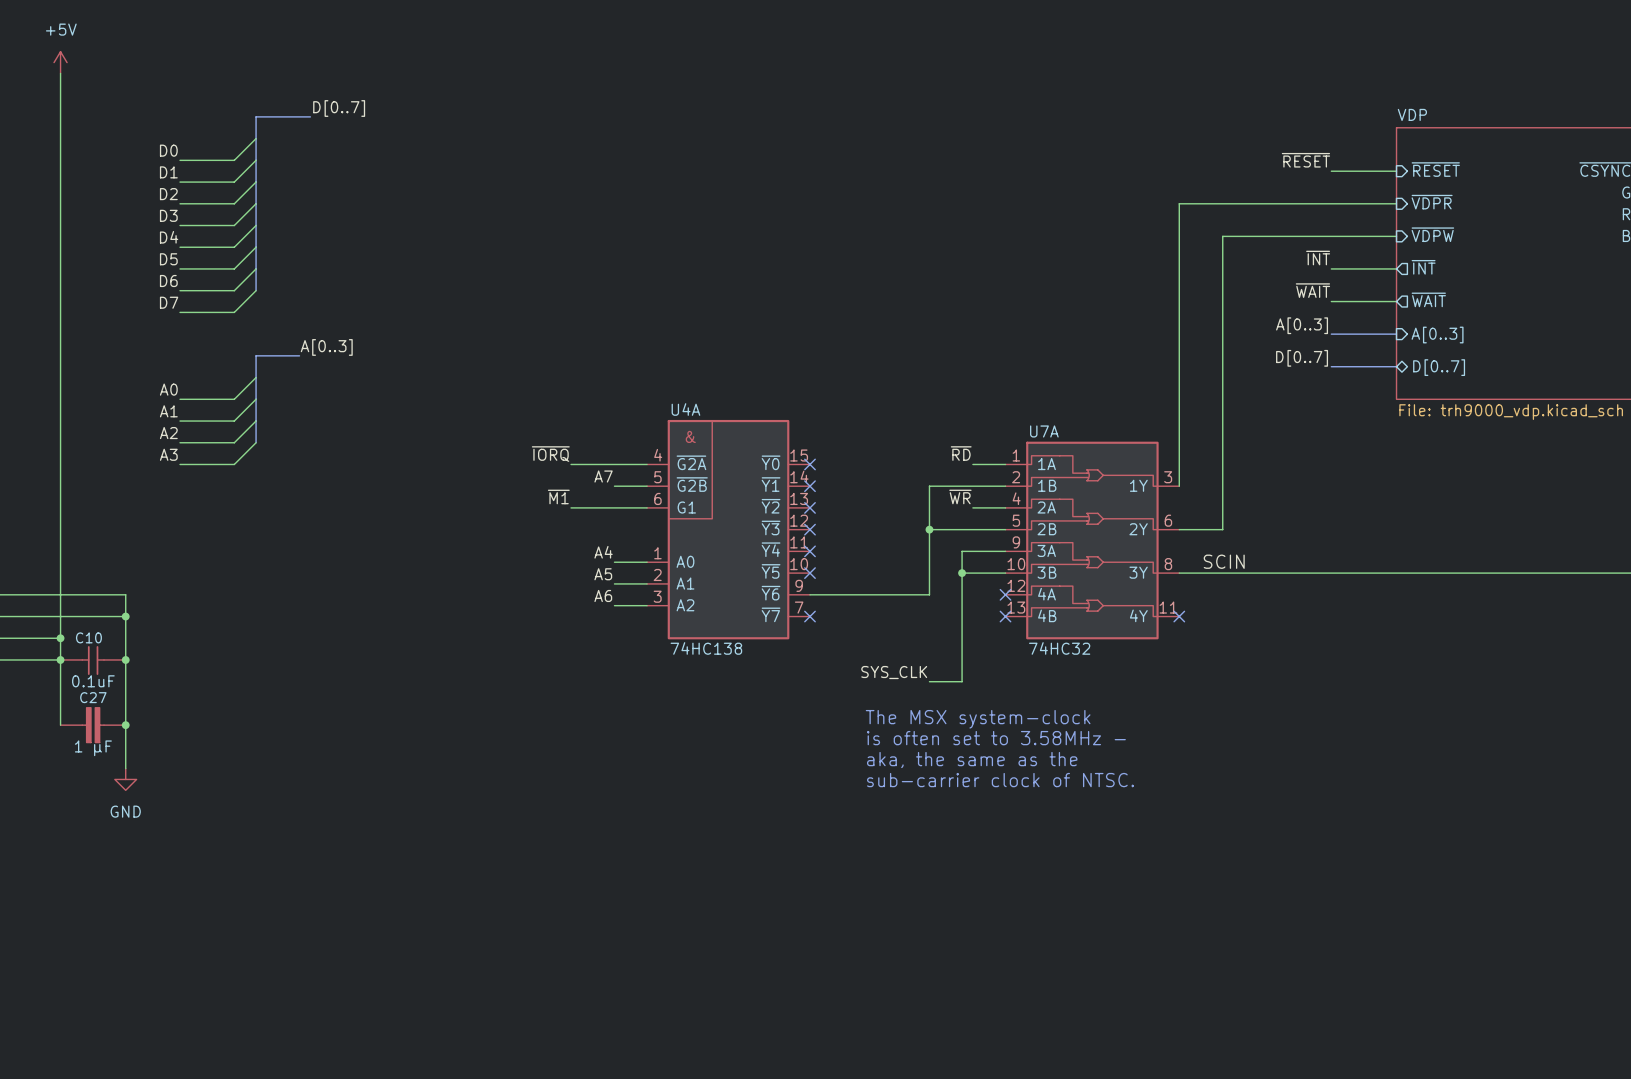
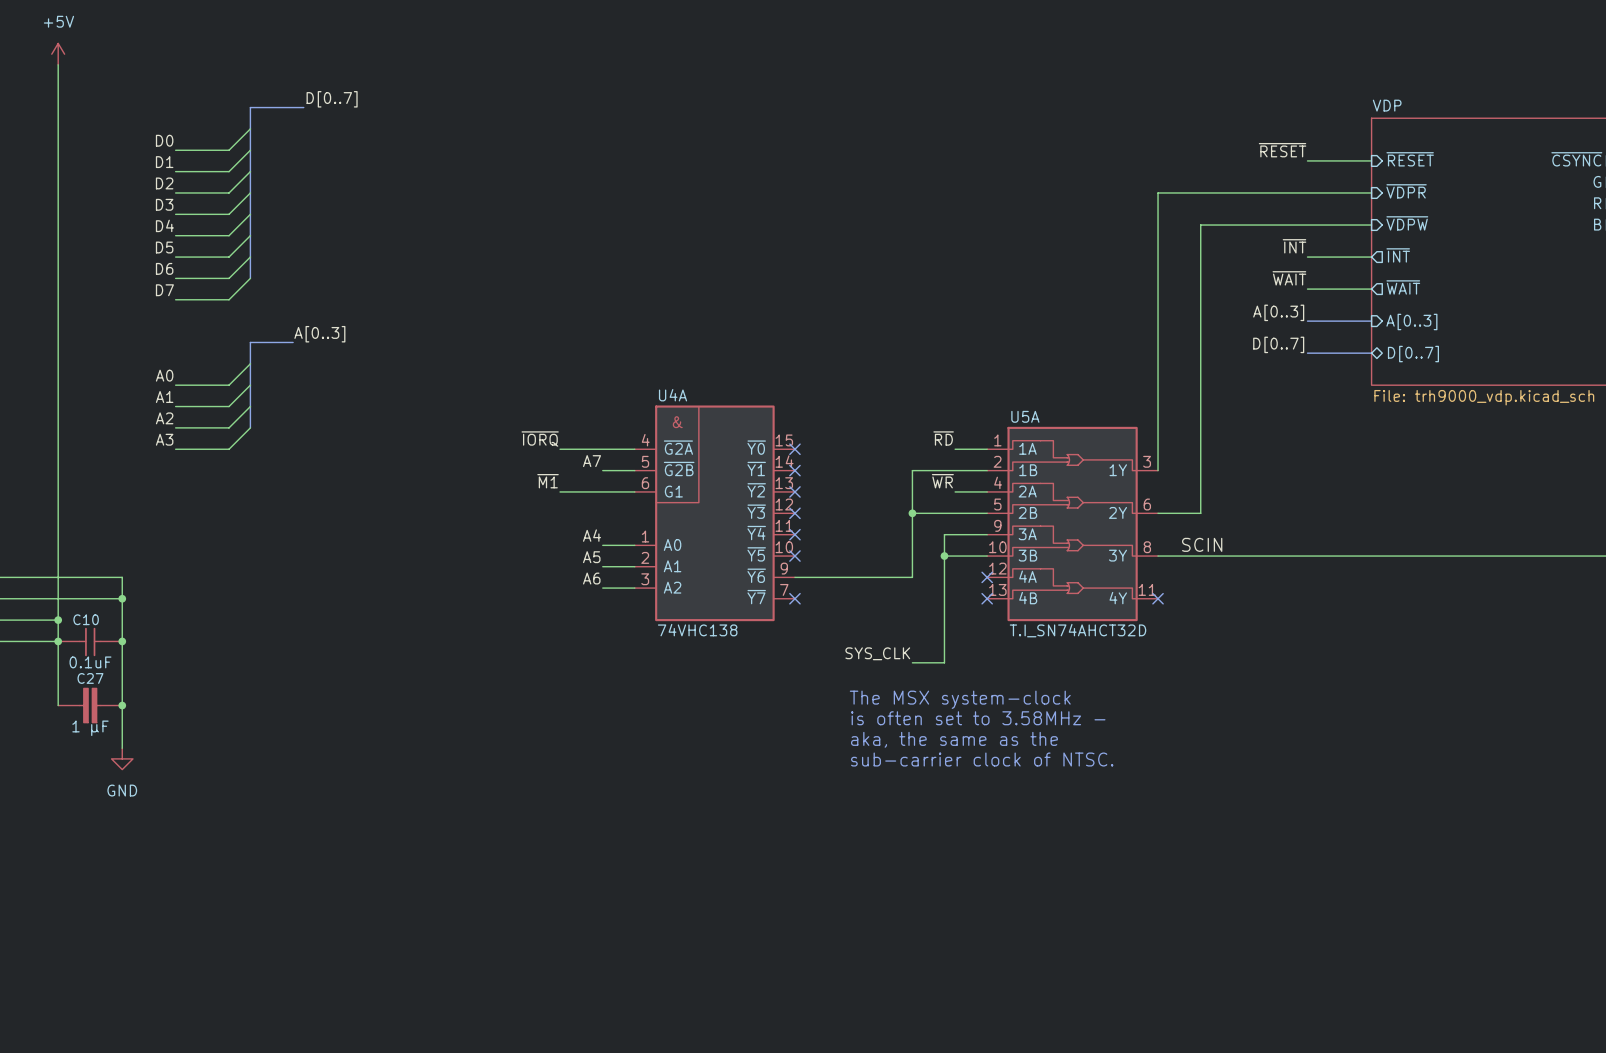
U7A name: U7A (1044, 431) -> U5A (1025, 416)
U4A value: 74HC138 (706, 648) -> 74VHC138 (697, 630)
U7A value: 74HC32 (1059, 648) -> T.I_SN74AHCT32D (1078, 630)

